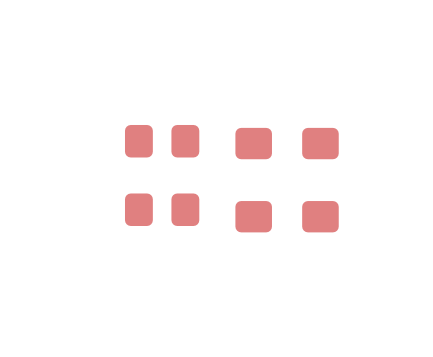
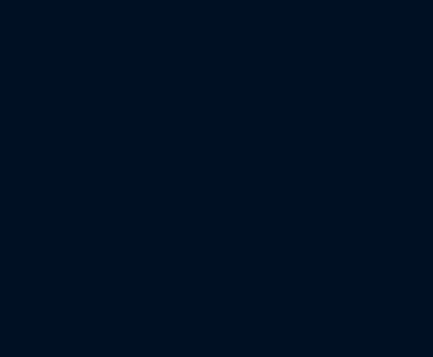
part: (162, 141) -> none
part: (287, 143) -> none
part: (162, 209) -> none
part: (287, 216) -> none

